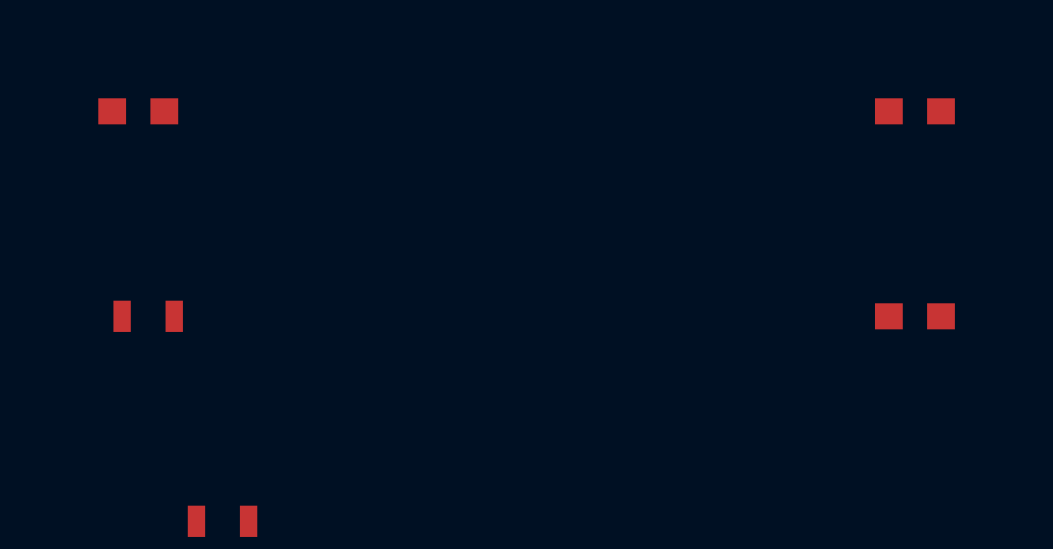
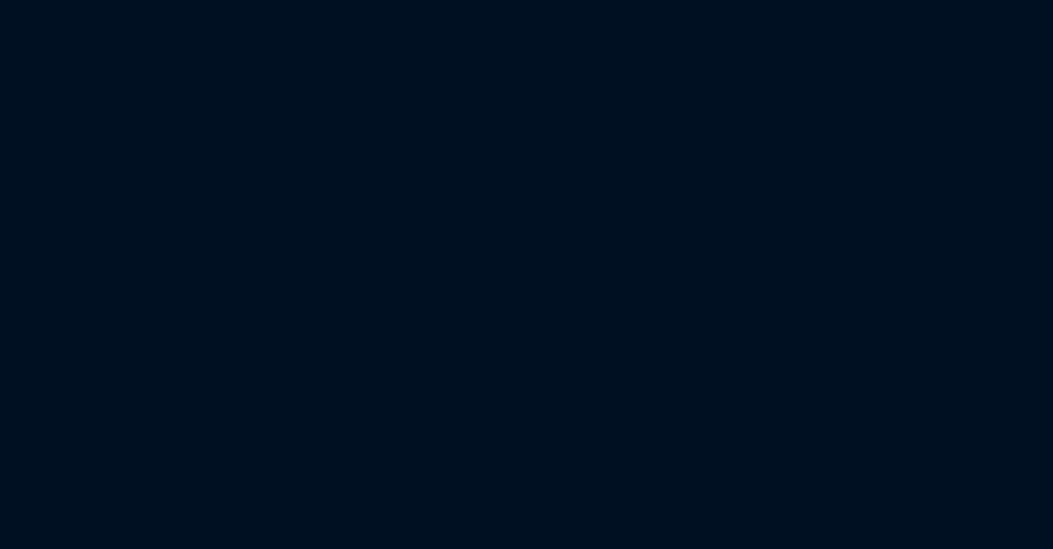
part: (138, 111) -> none
part: (914, 111) -> none
part: (148, 316) -> none
part: (914, 316) -> none
part: (222, 521) -> none

